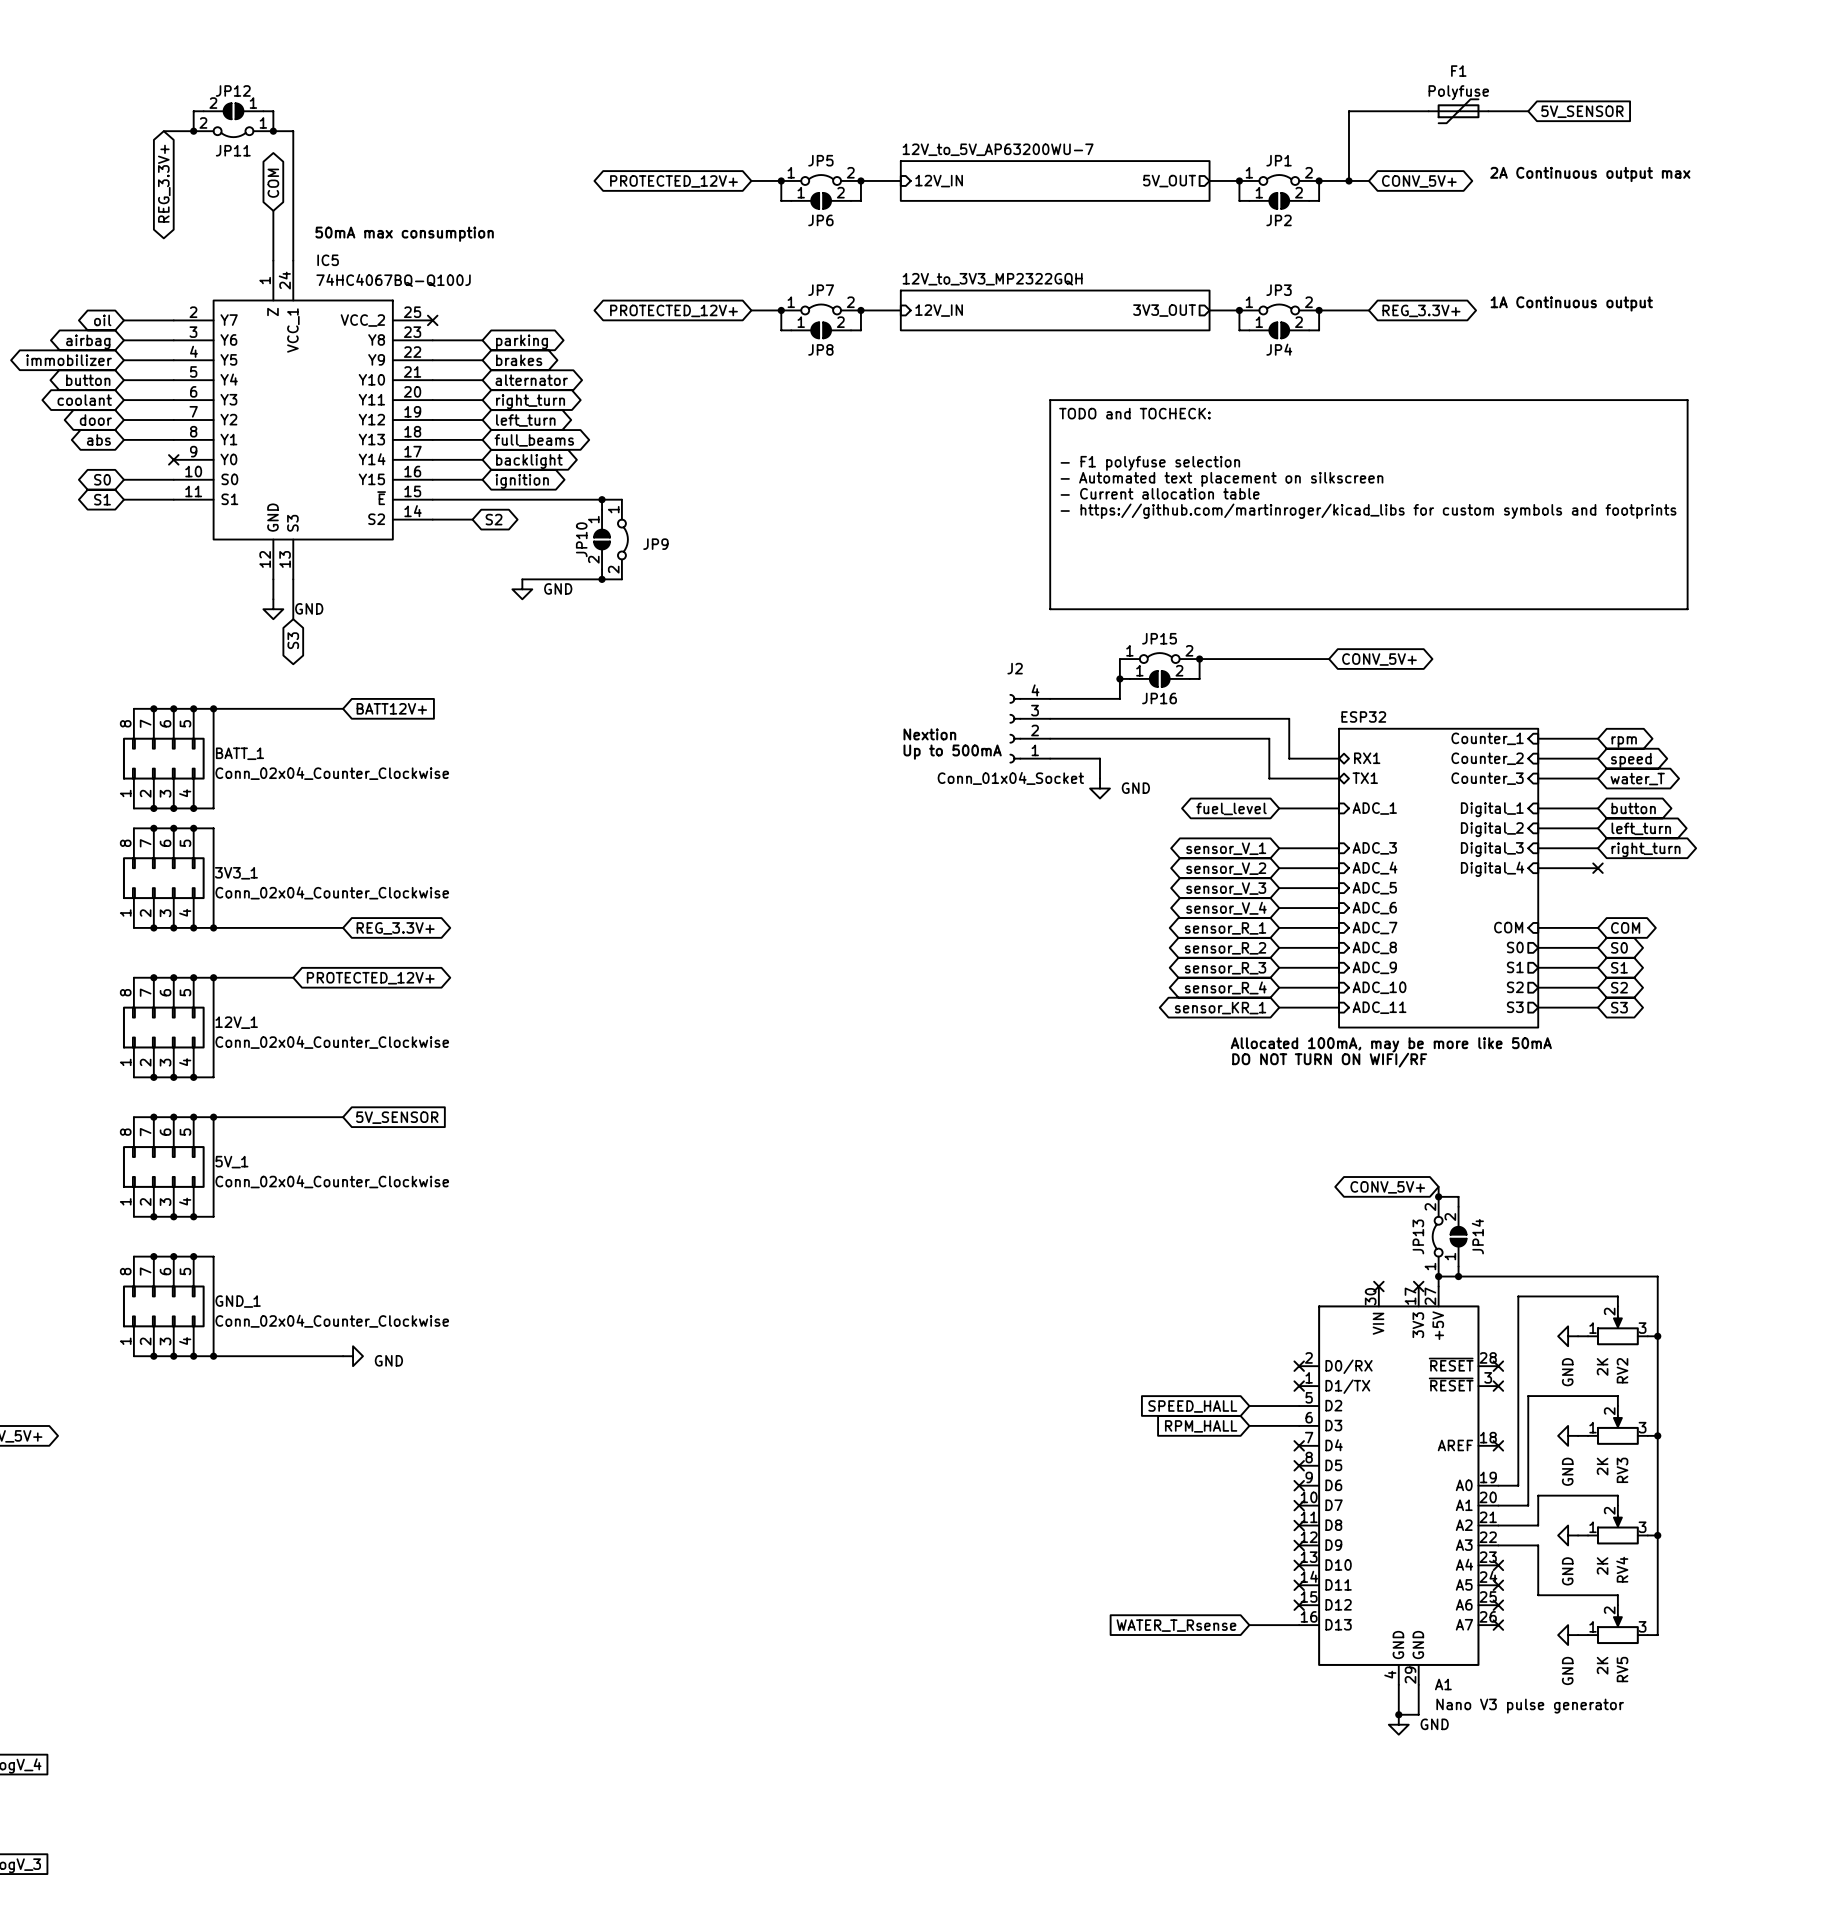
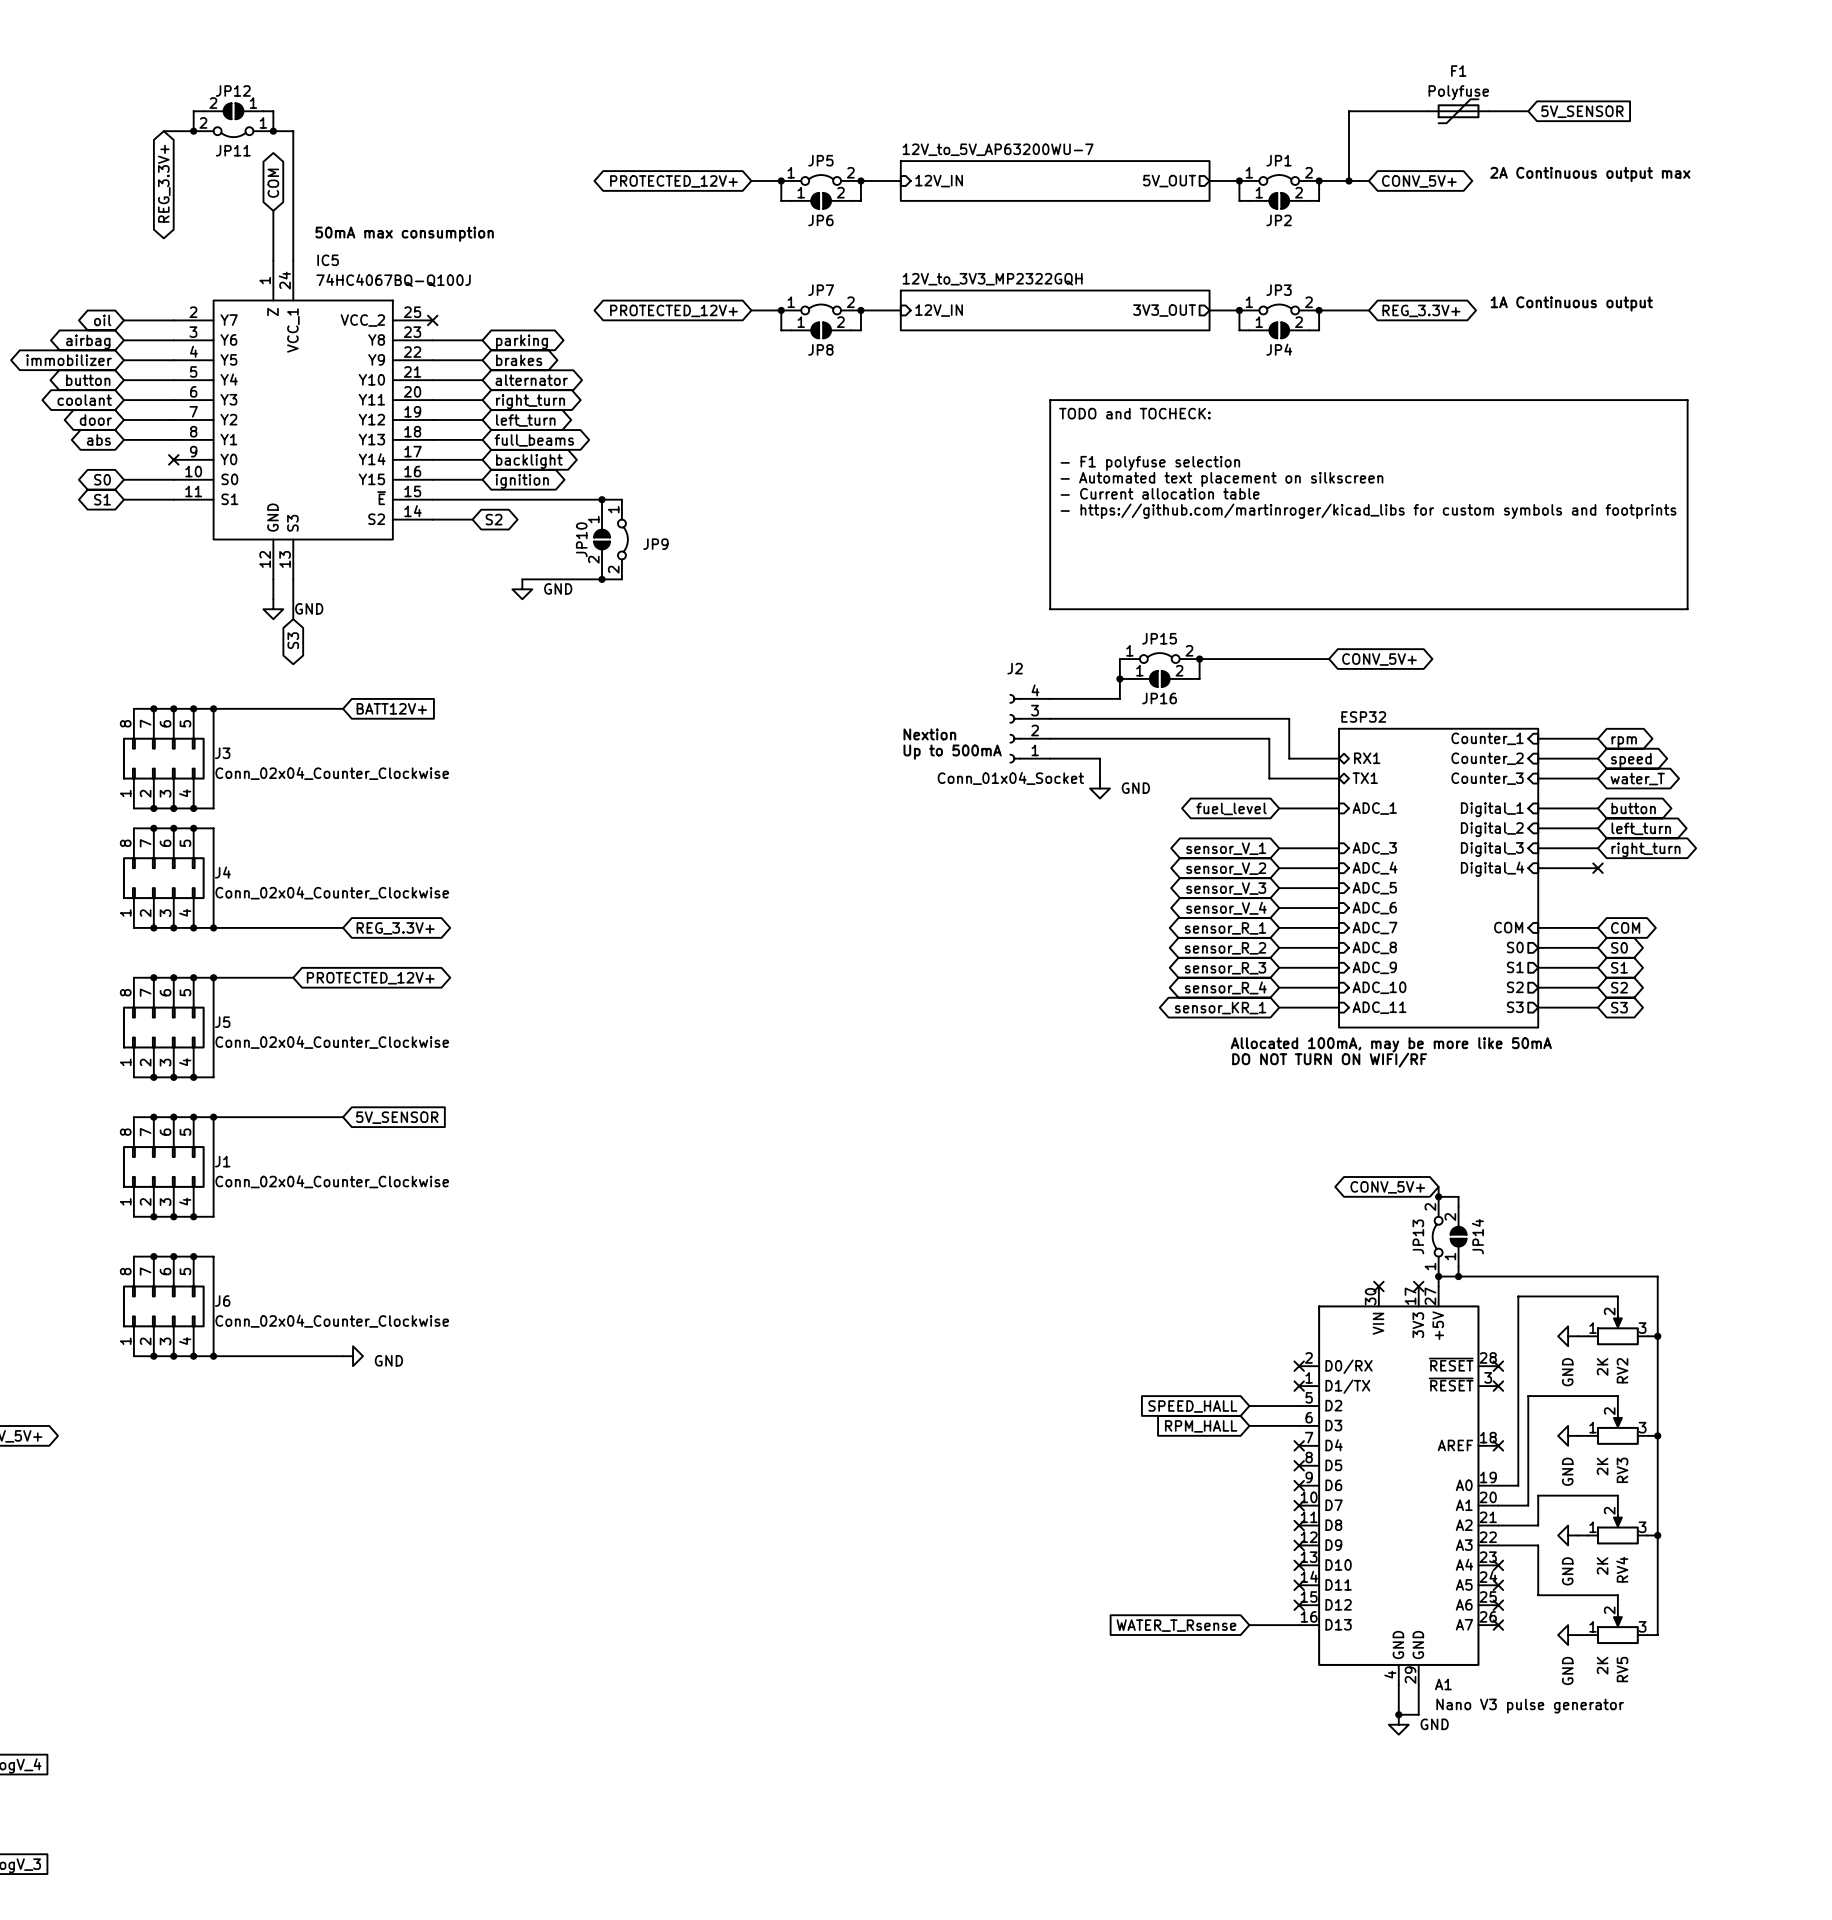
BATT_1 name: BATT_1 (240, 753) -> J3 (222, 753)
3V3_1 name: 3V3_1 (236, 873) -> J4 (222, 872)
12V_1 name: 12V_1 (236, 1022) -> J5 (222, 1022)
5V_1 name: 5V_1 (231, 1162) -> J1 (222, 1161)
GND_1 name: GND_1 (238, 1301) -> J6 (222, 1301)

